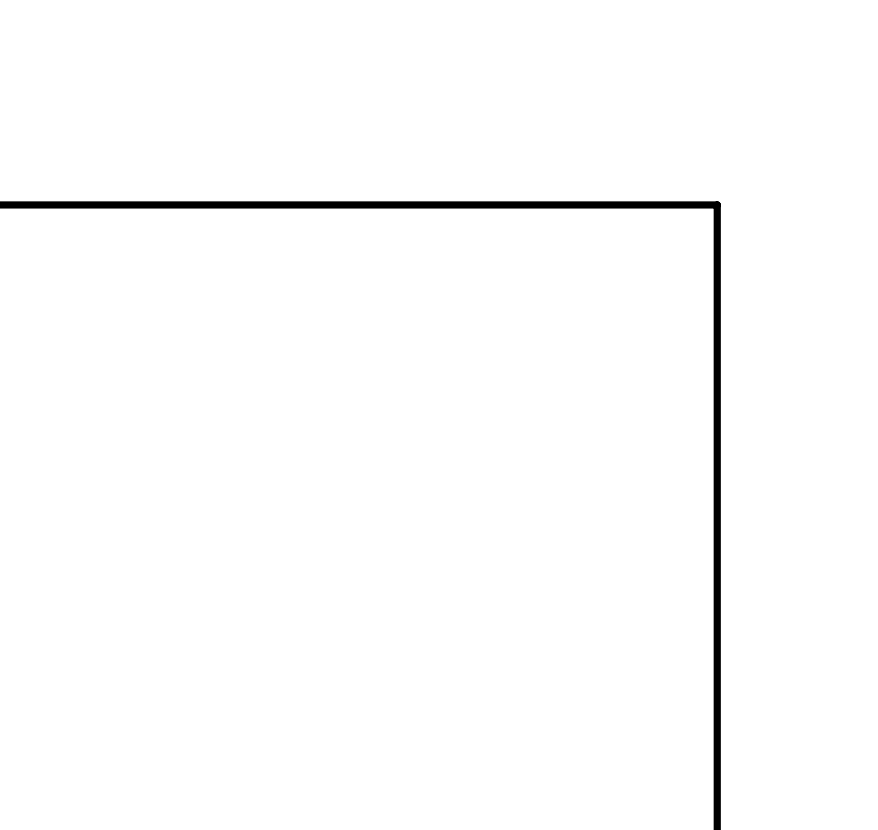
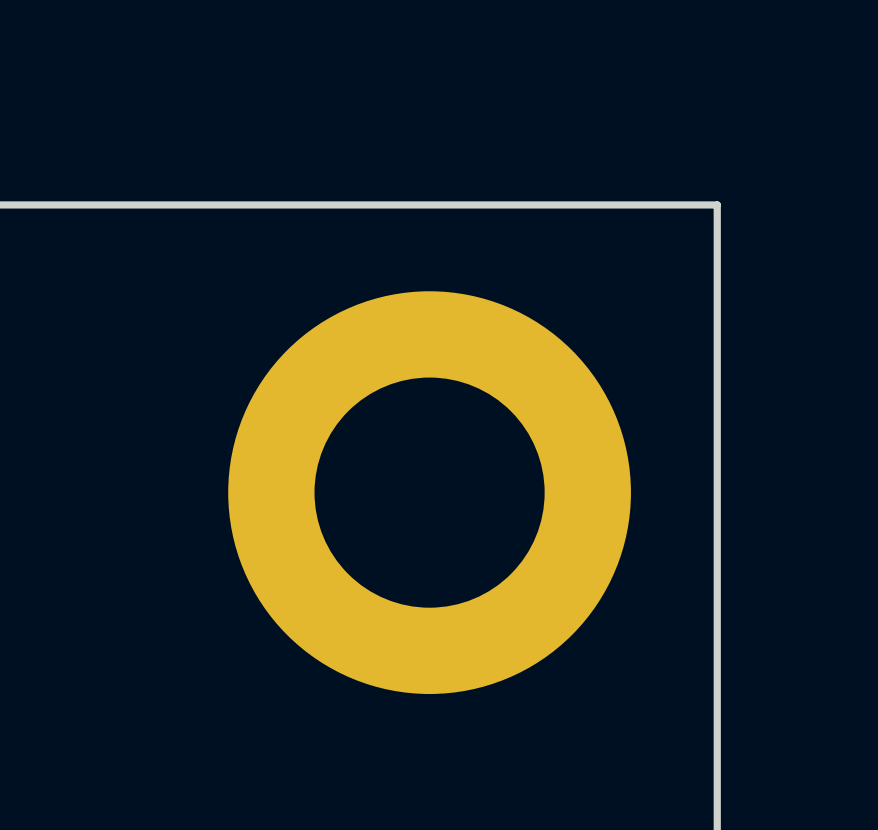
part: none -> (429, 492)

